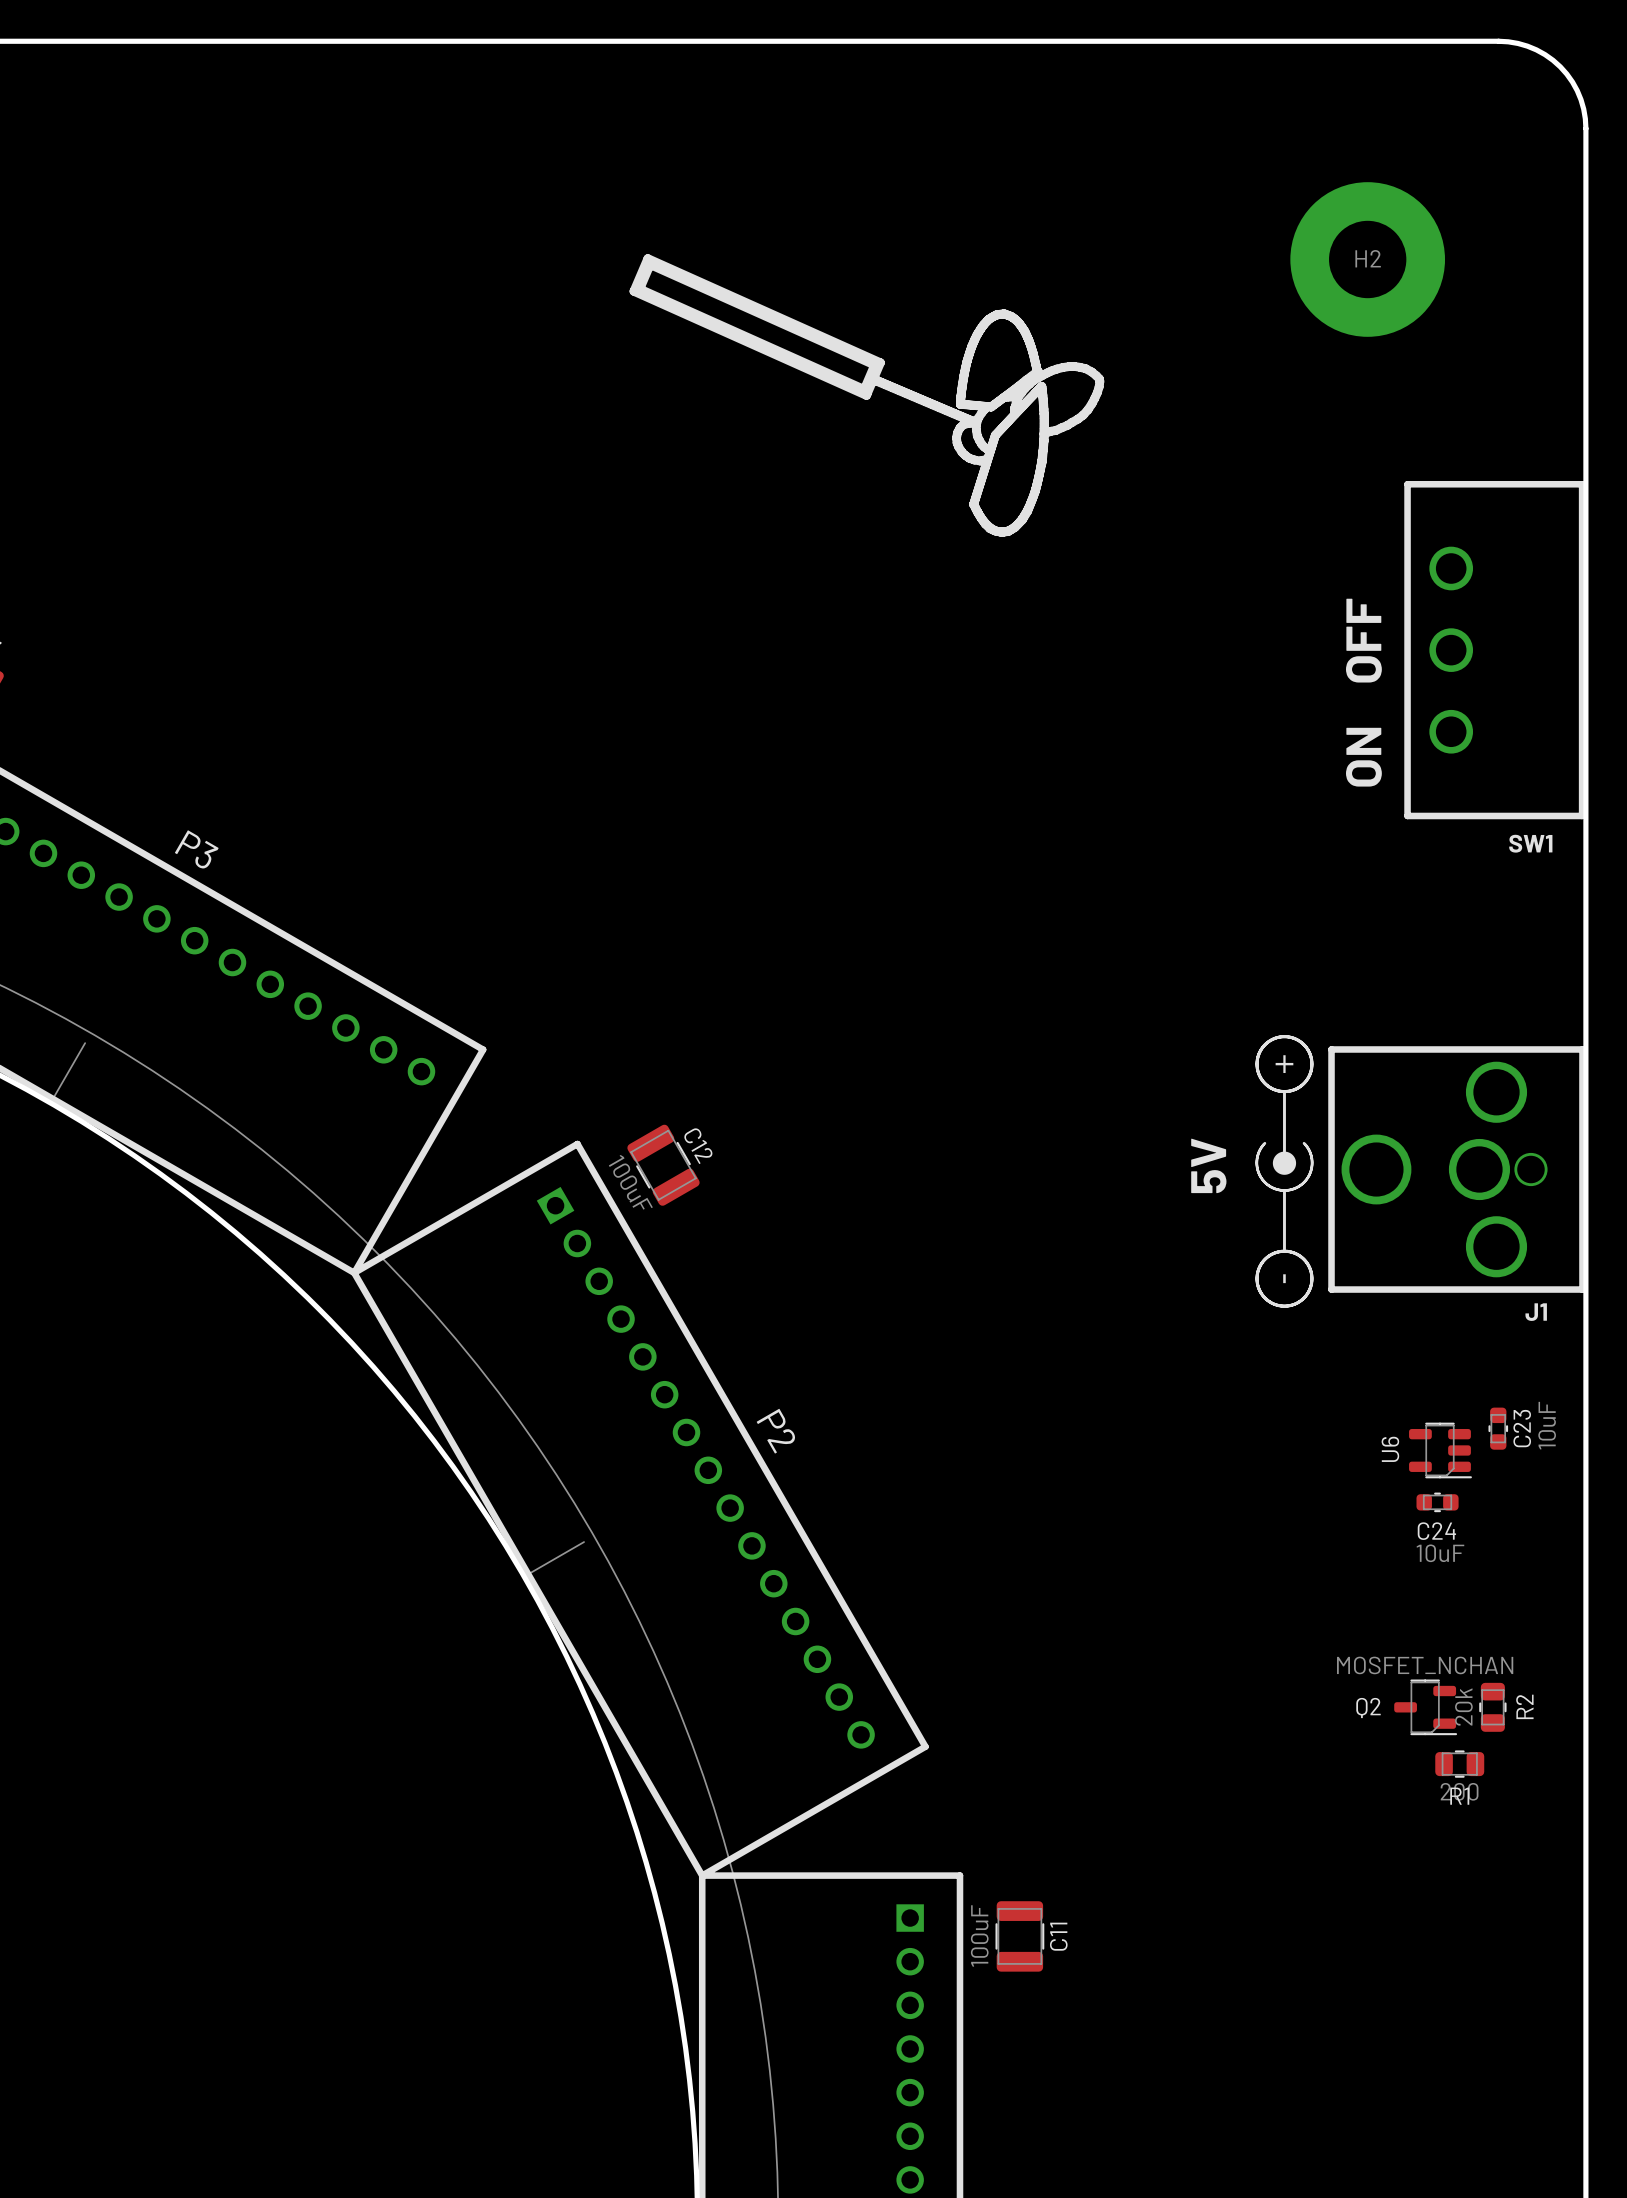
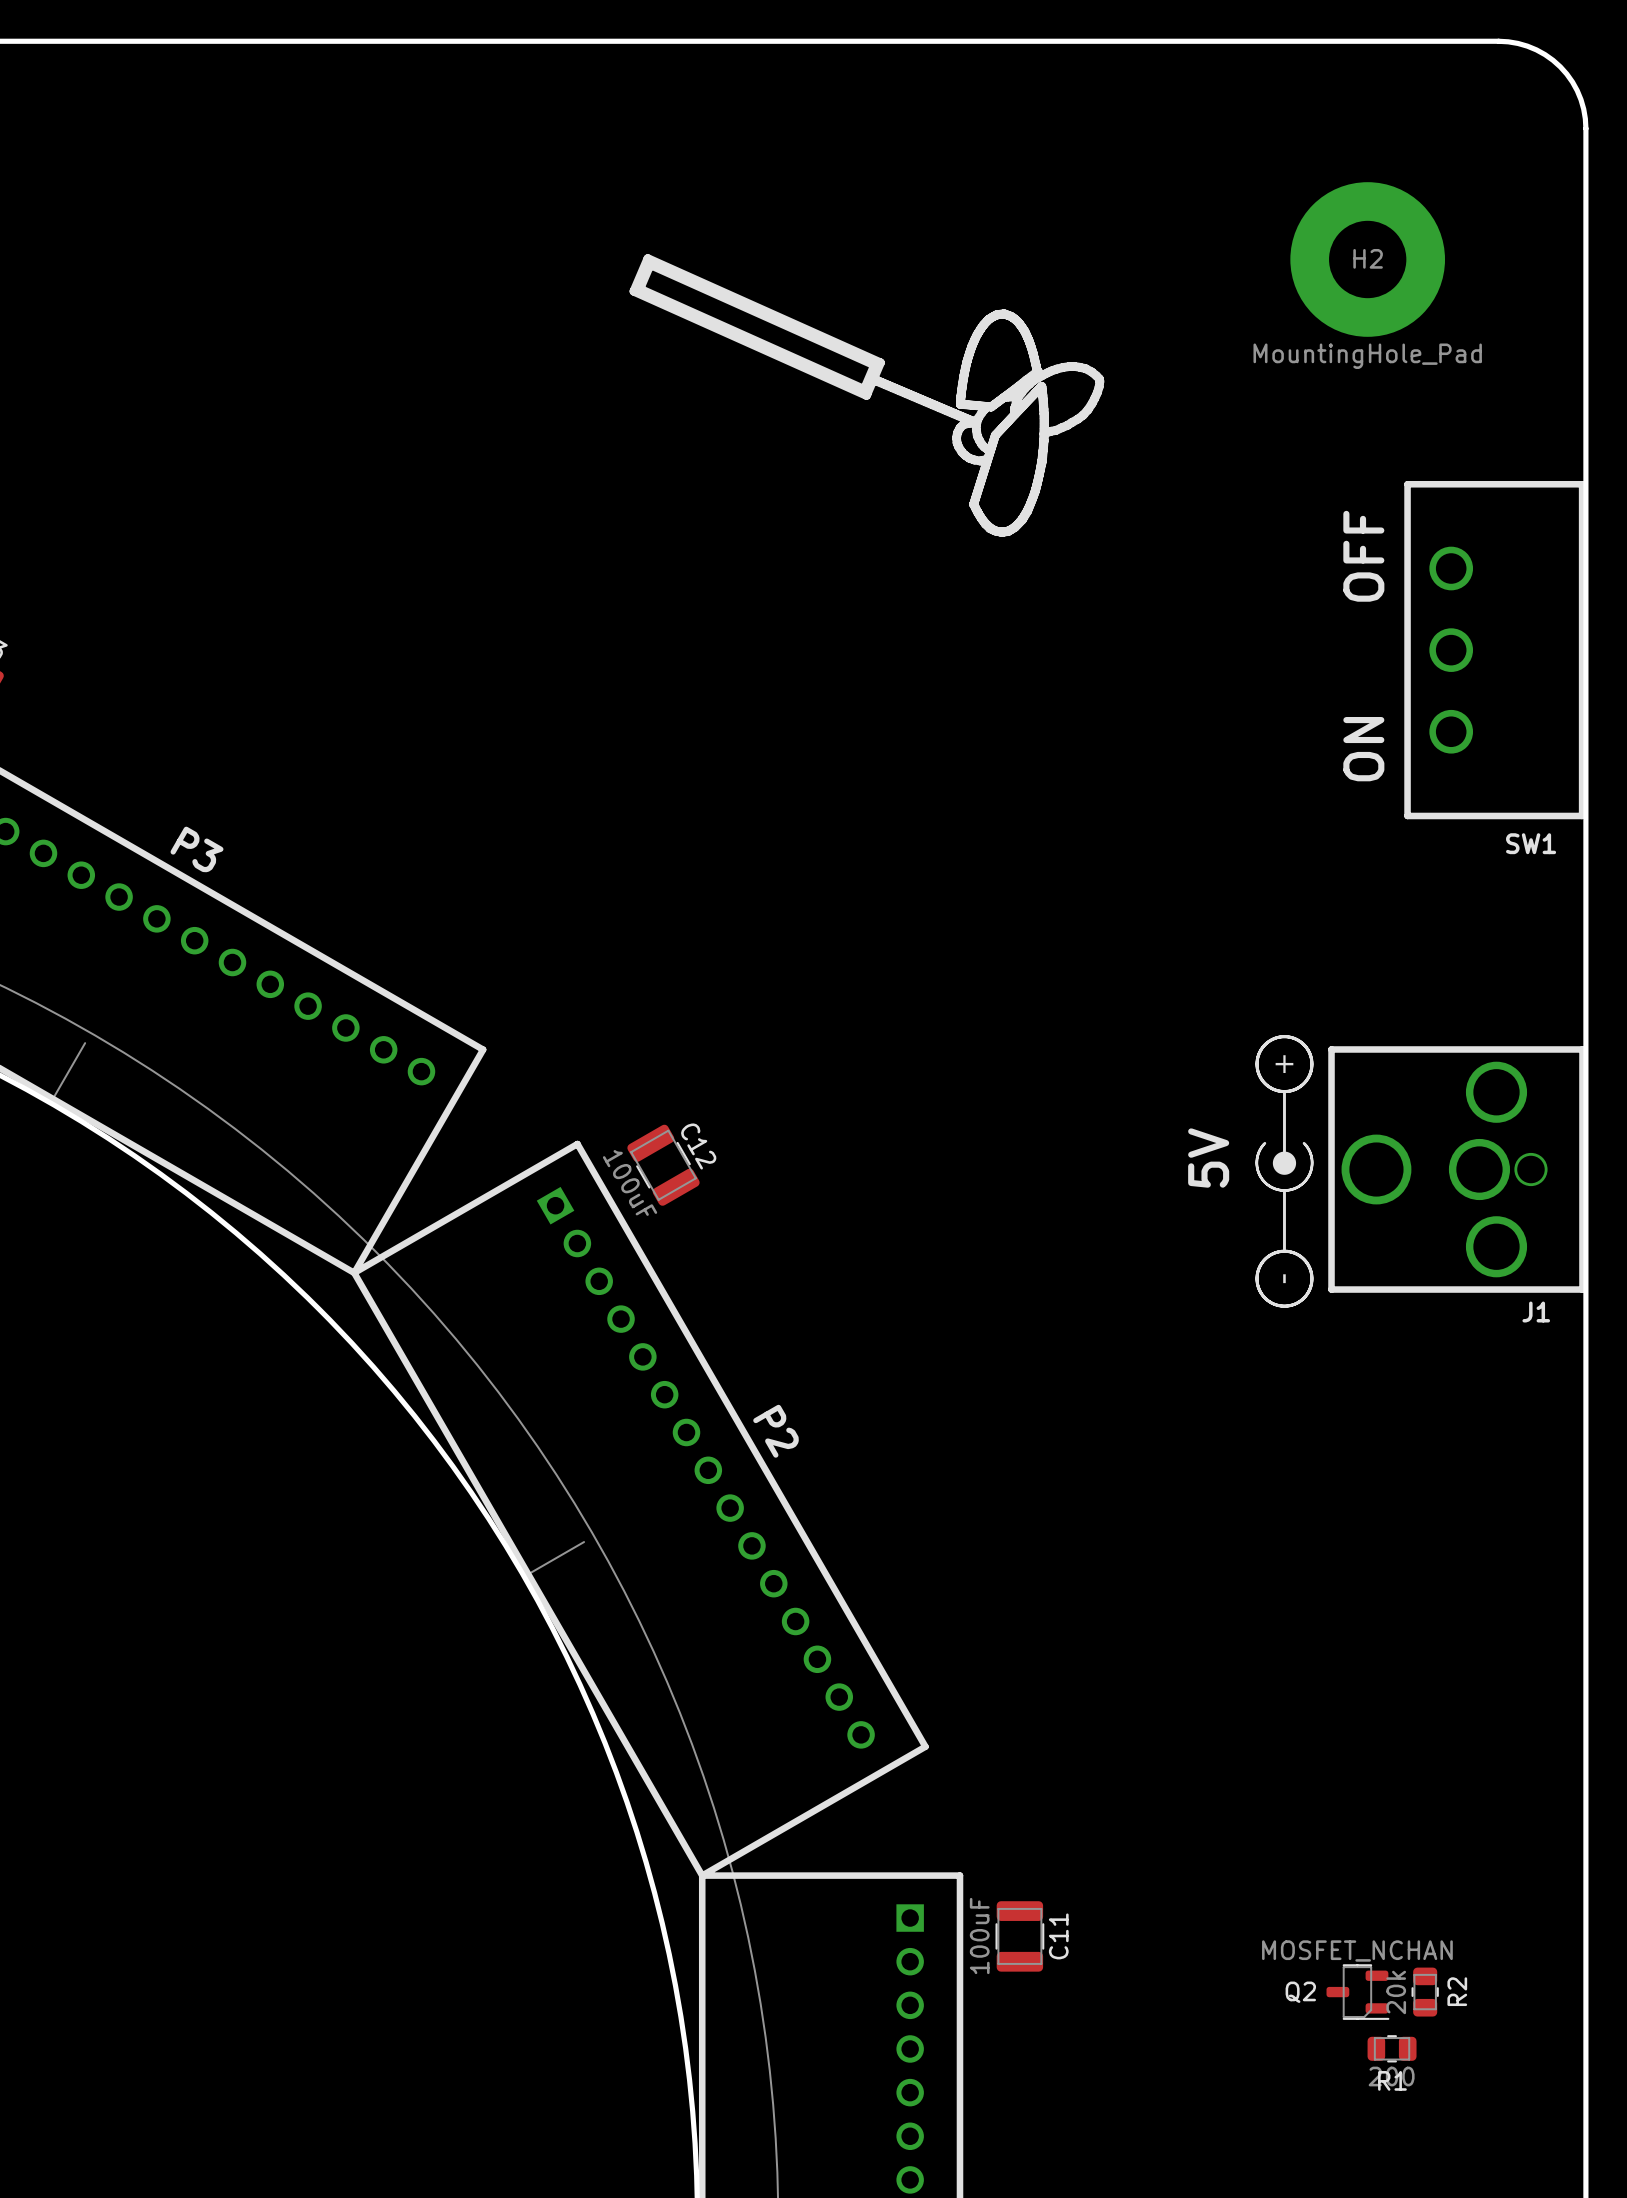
H2 value: none -> MountingHole_Pad (1367, 356)
C23: 10uF (1498, 1428) -> none
U6: (1440, 1450) -> none
C24: 10uF (1437, 1502) -> none
Q2 position: (1425, 1707) -> (1357, 1992)
R2 position: (1492, 1707) -> (1425, 1992)
R1 position: (1459, 1764) -> (1392, 2048)

